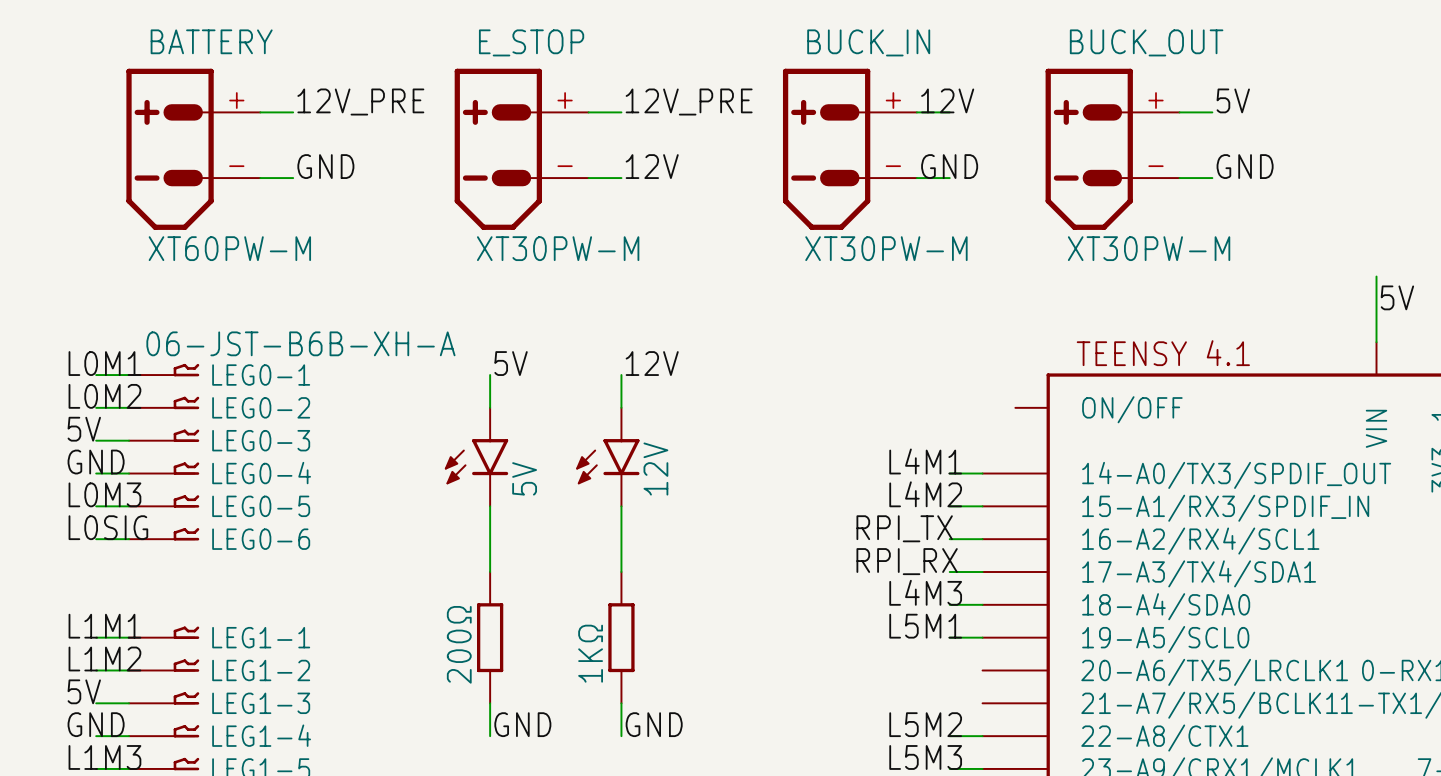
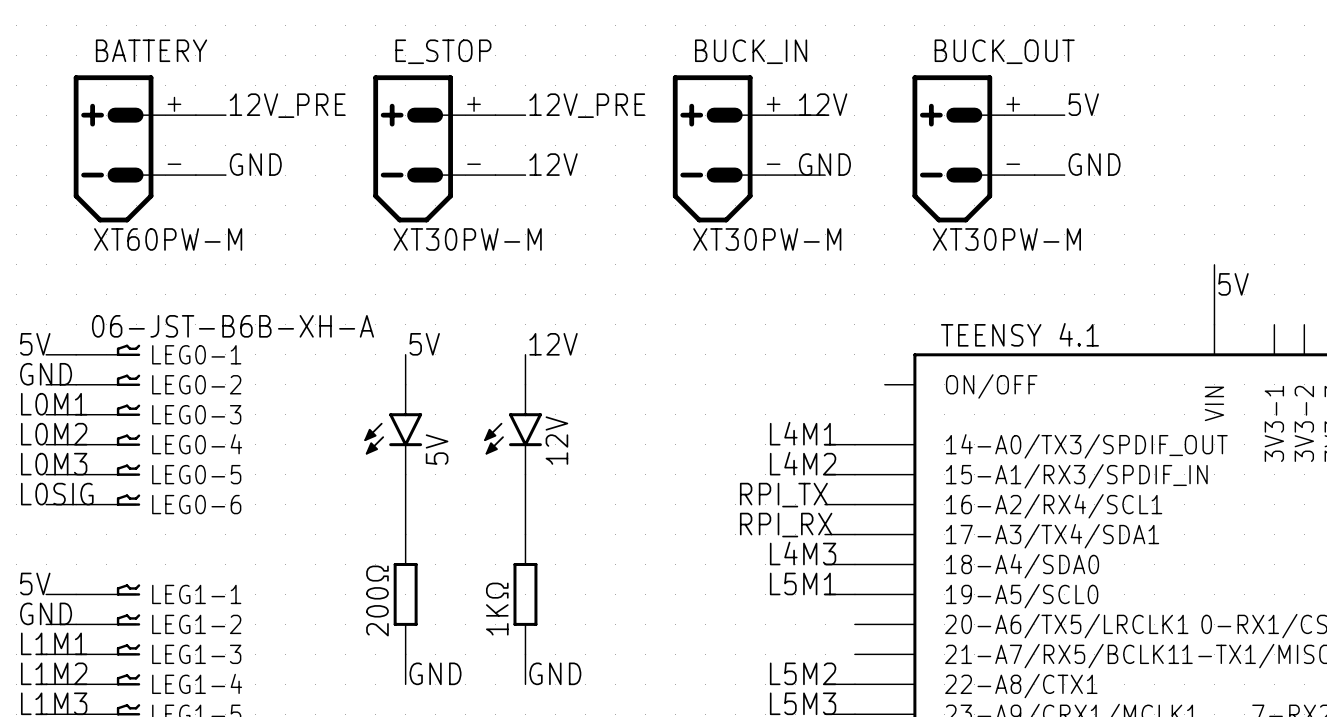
label: L0M1 (104, 363) -> 5V (35, 344)
label: L0M2 (104, 396) -> GND (46, 374)
label: 5V (84, 429) -> L0M1 (54, 404)
label: GND (96, 462) -> L0M2 (54, 434)
label: L1M1 (104, 626) -> 5V (35, 583)
label: L1M2 (104, 659) -> GND (46, 613)
label: 5V (84, 691) -> L1M1 (54, 643)
label: GND (96, 724) -> L1M2 (54, 673)

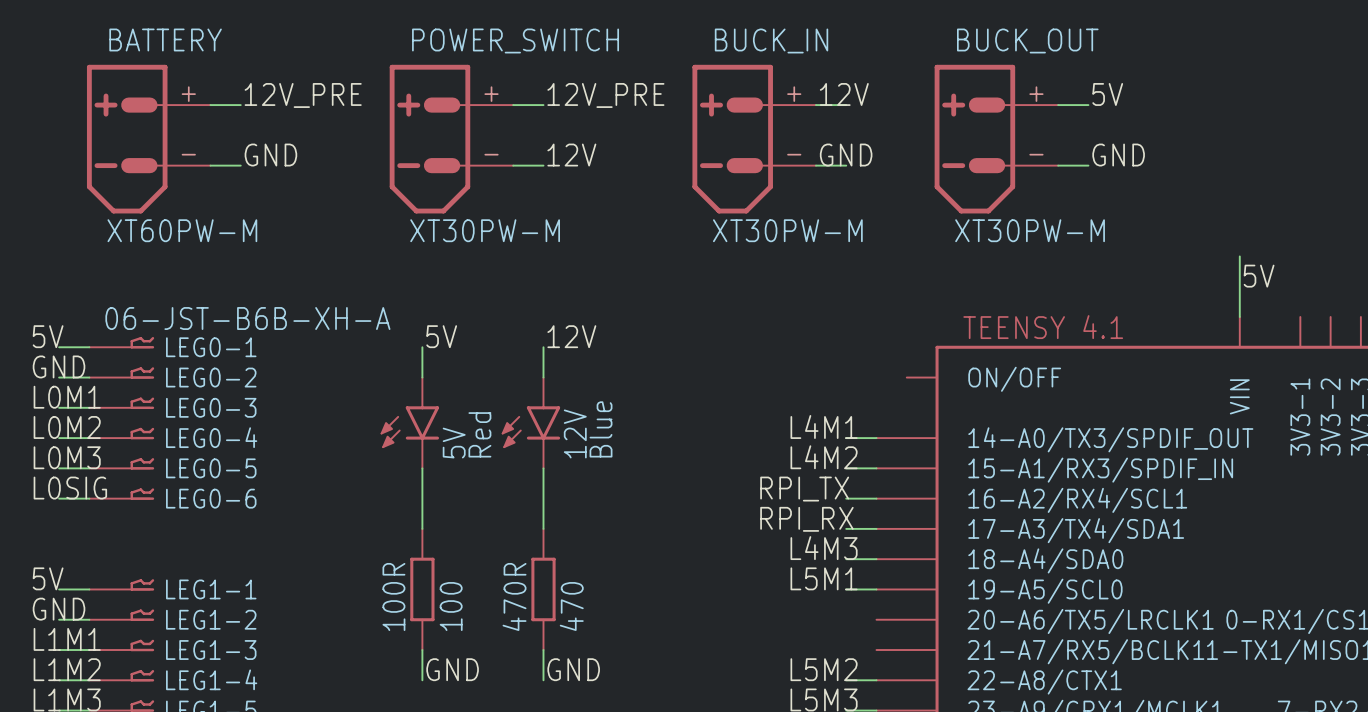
E_STOP name: E_STOP (443, 51) -> POWER_SWITCH (515, 40)
12V value: none -> Blue (601, 429)
5V value: none -> Red (479, 434)
200Ω name: 200Ω (377, 600) -> 100R (393, 596)
1KΩ name: 1KΩ (497, 609) -> 470R (514, 596)
200Ω value: none -> 100 (451, 606)
1KΩ value: none -> 470 (571, 606)

